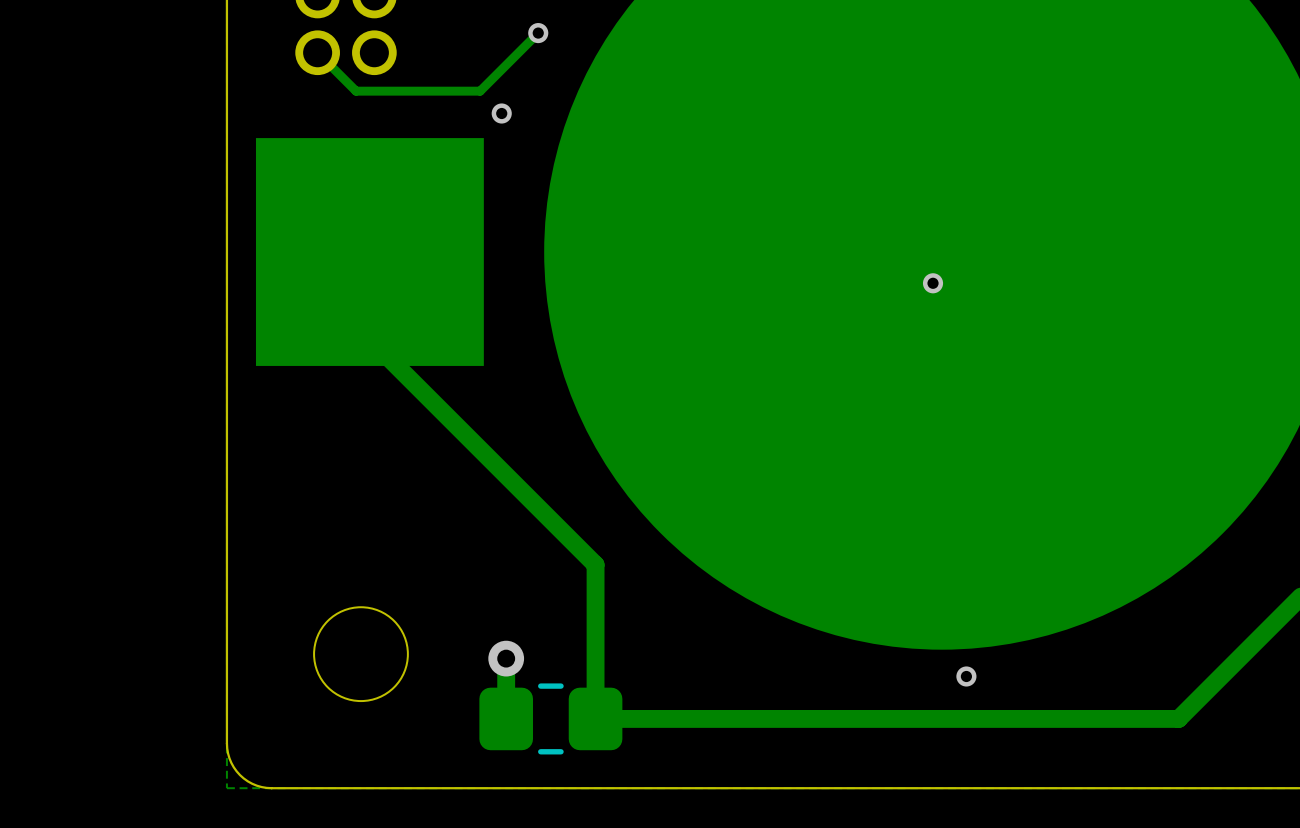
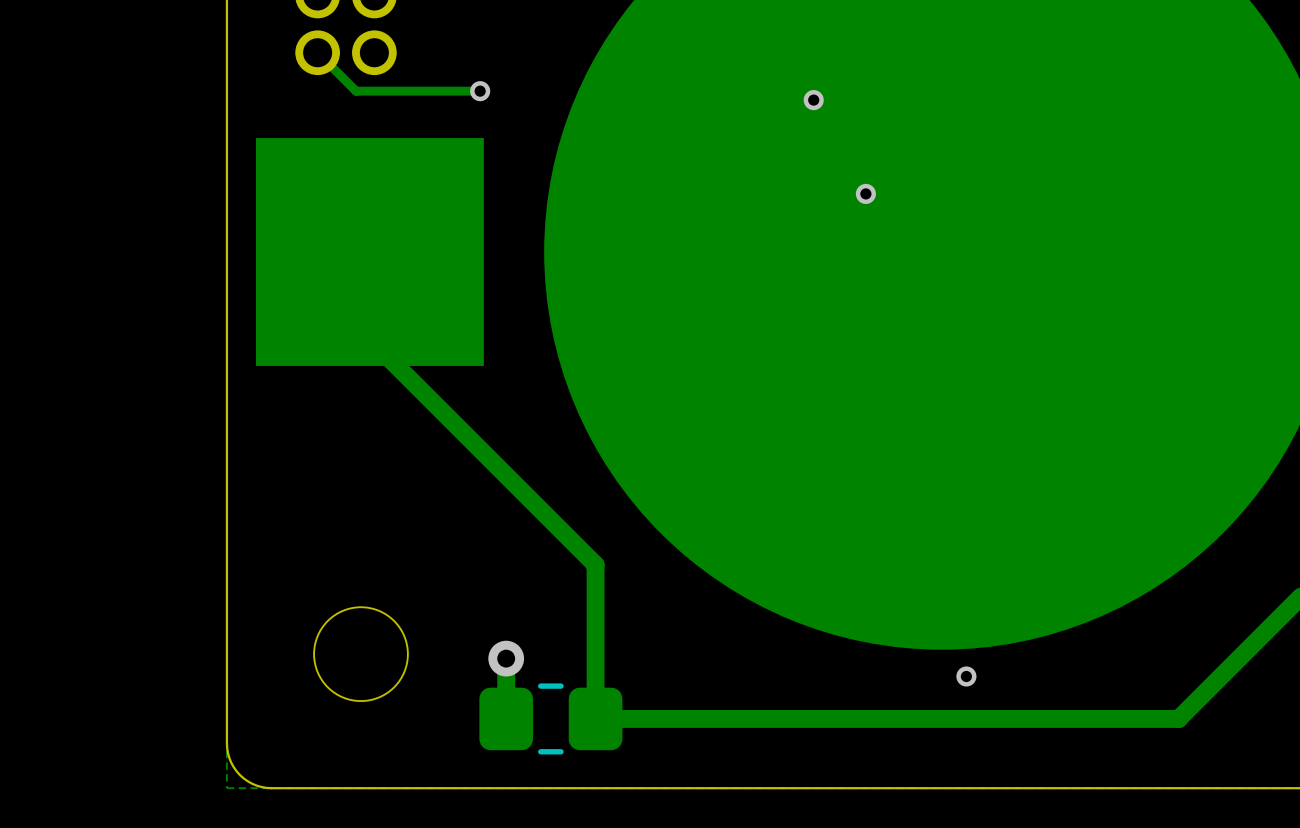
track: (538, 33) (480, 91) -> none
via: (538, 33) -> none
via: none -> (813, 100)
via position: (501, 113) -> (480, 91)
via: none -> (865, 193)
via: (933, 283) -> none

